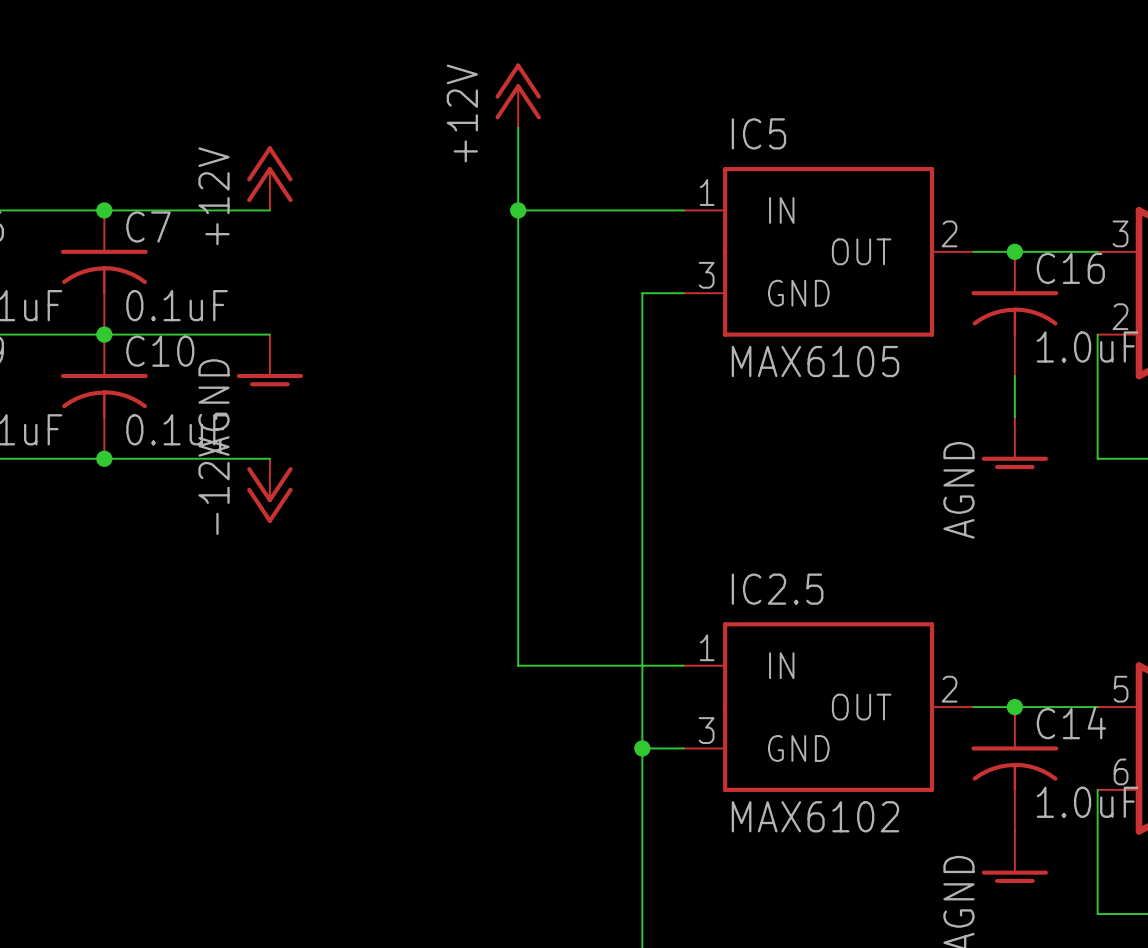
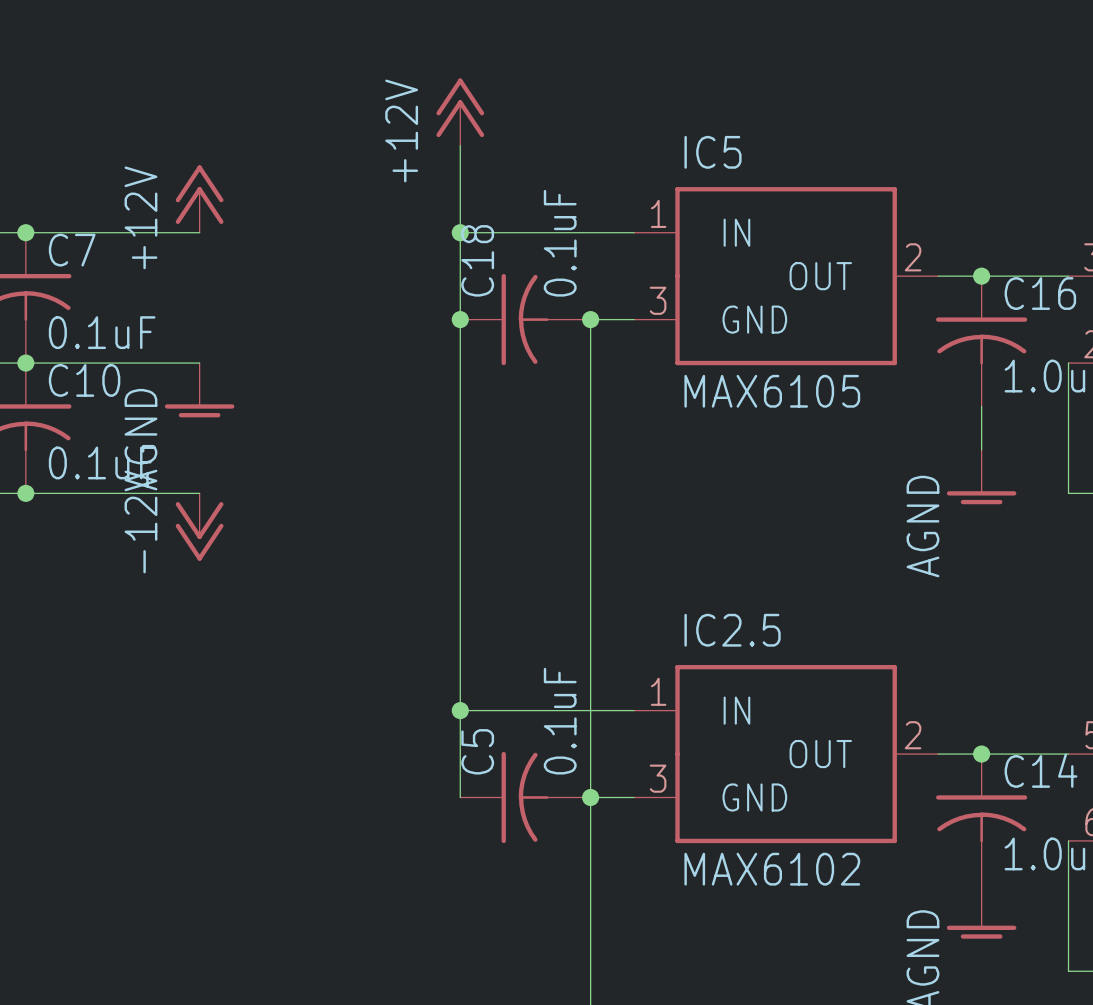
junction: none -> (460, 319)
C18: none -> 0.1uF (525, 319)
junction: none -> (590, 319)
wire: none -> (460, 710) (460, 797)
junction: none -> (460, 710)
C5: none -> 0.1uF (525, 797)

